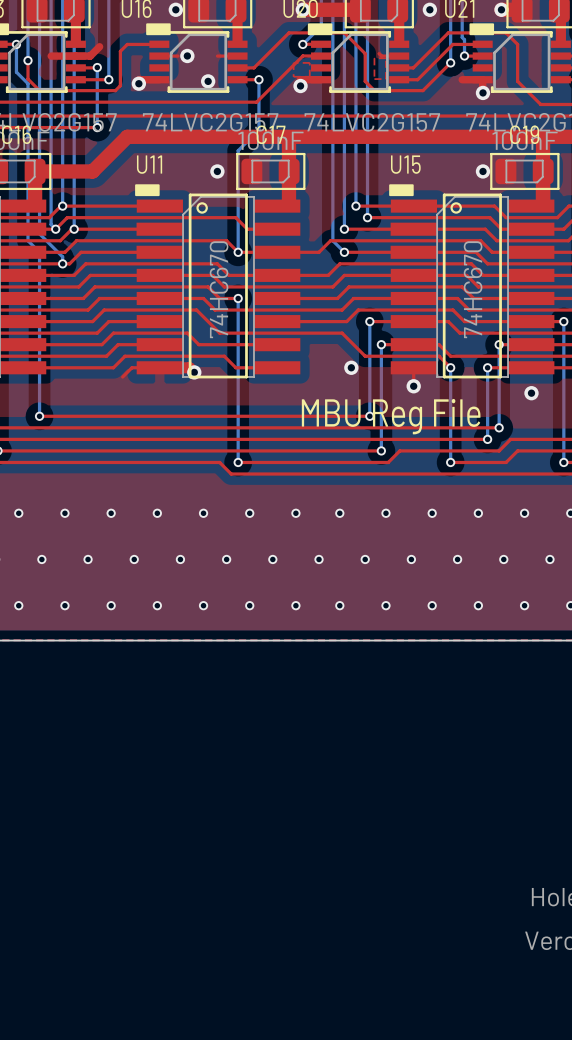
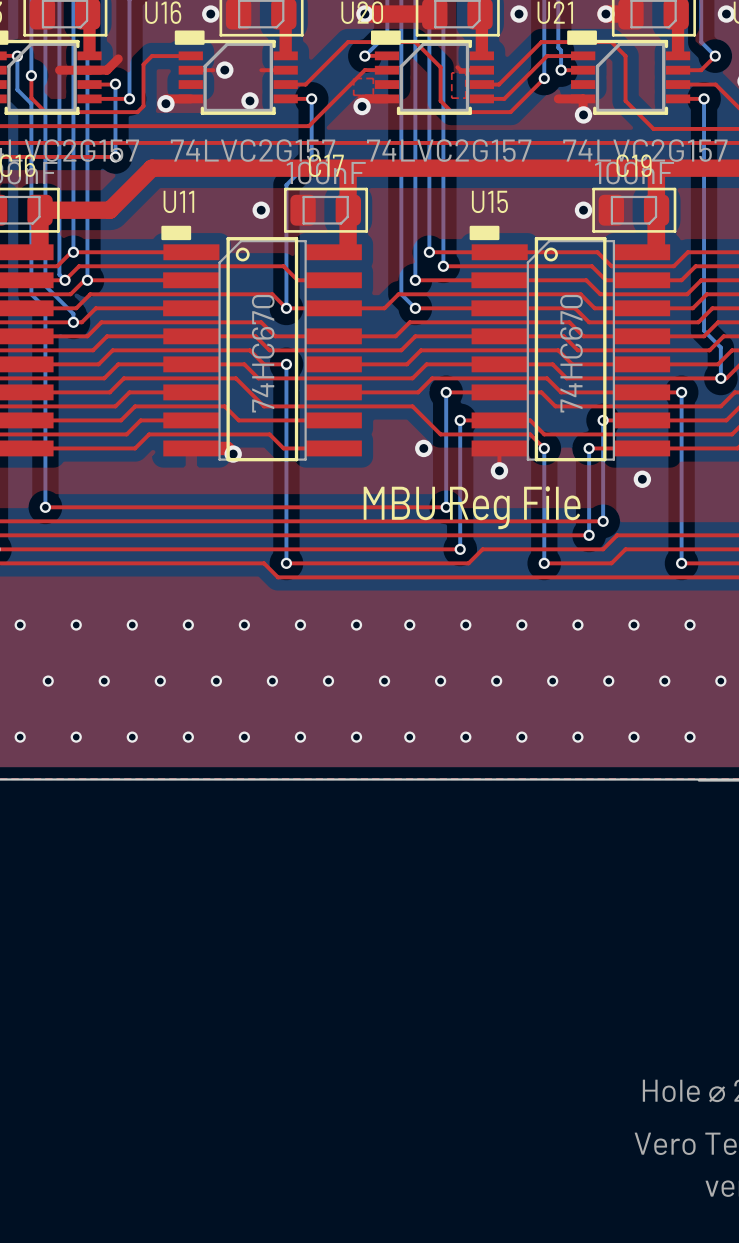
top track: (159, 367) (131, 367) (122, 377) -> none

